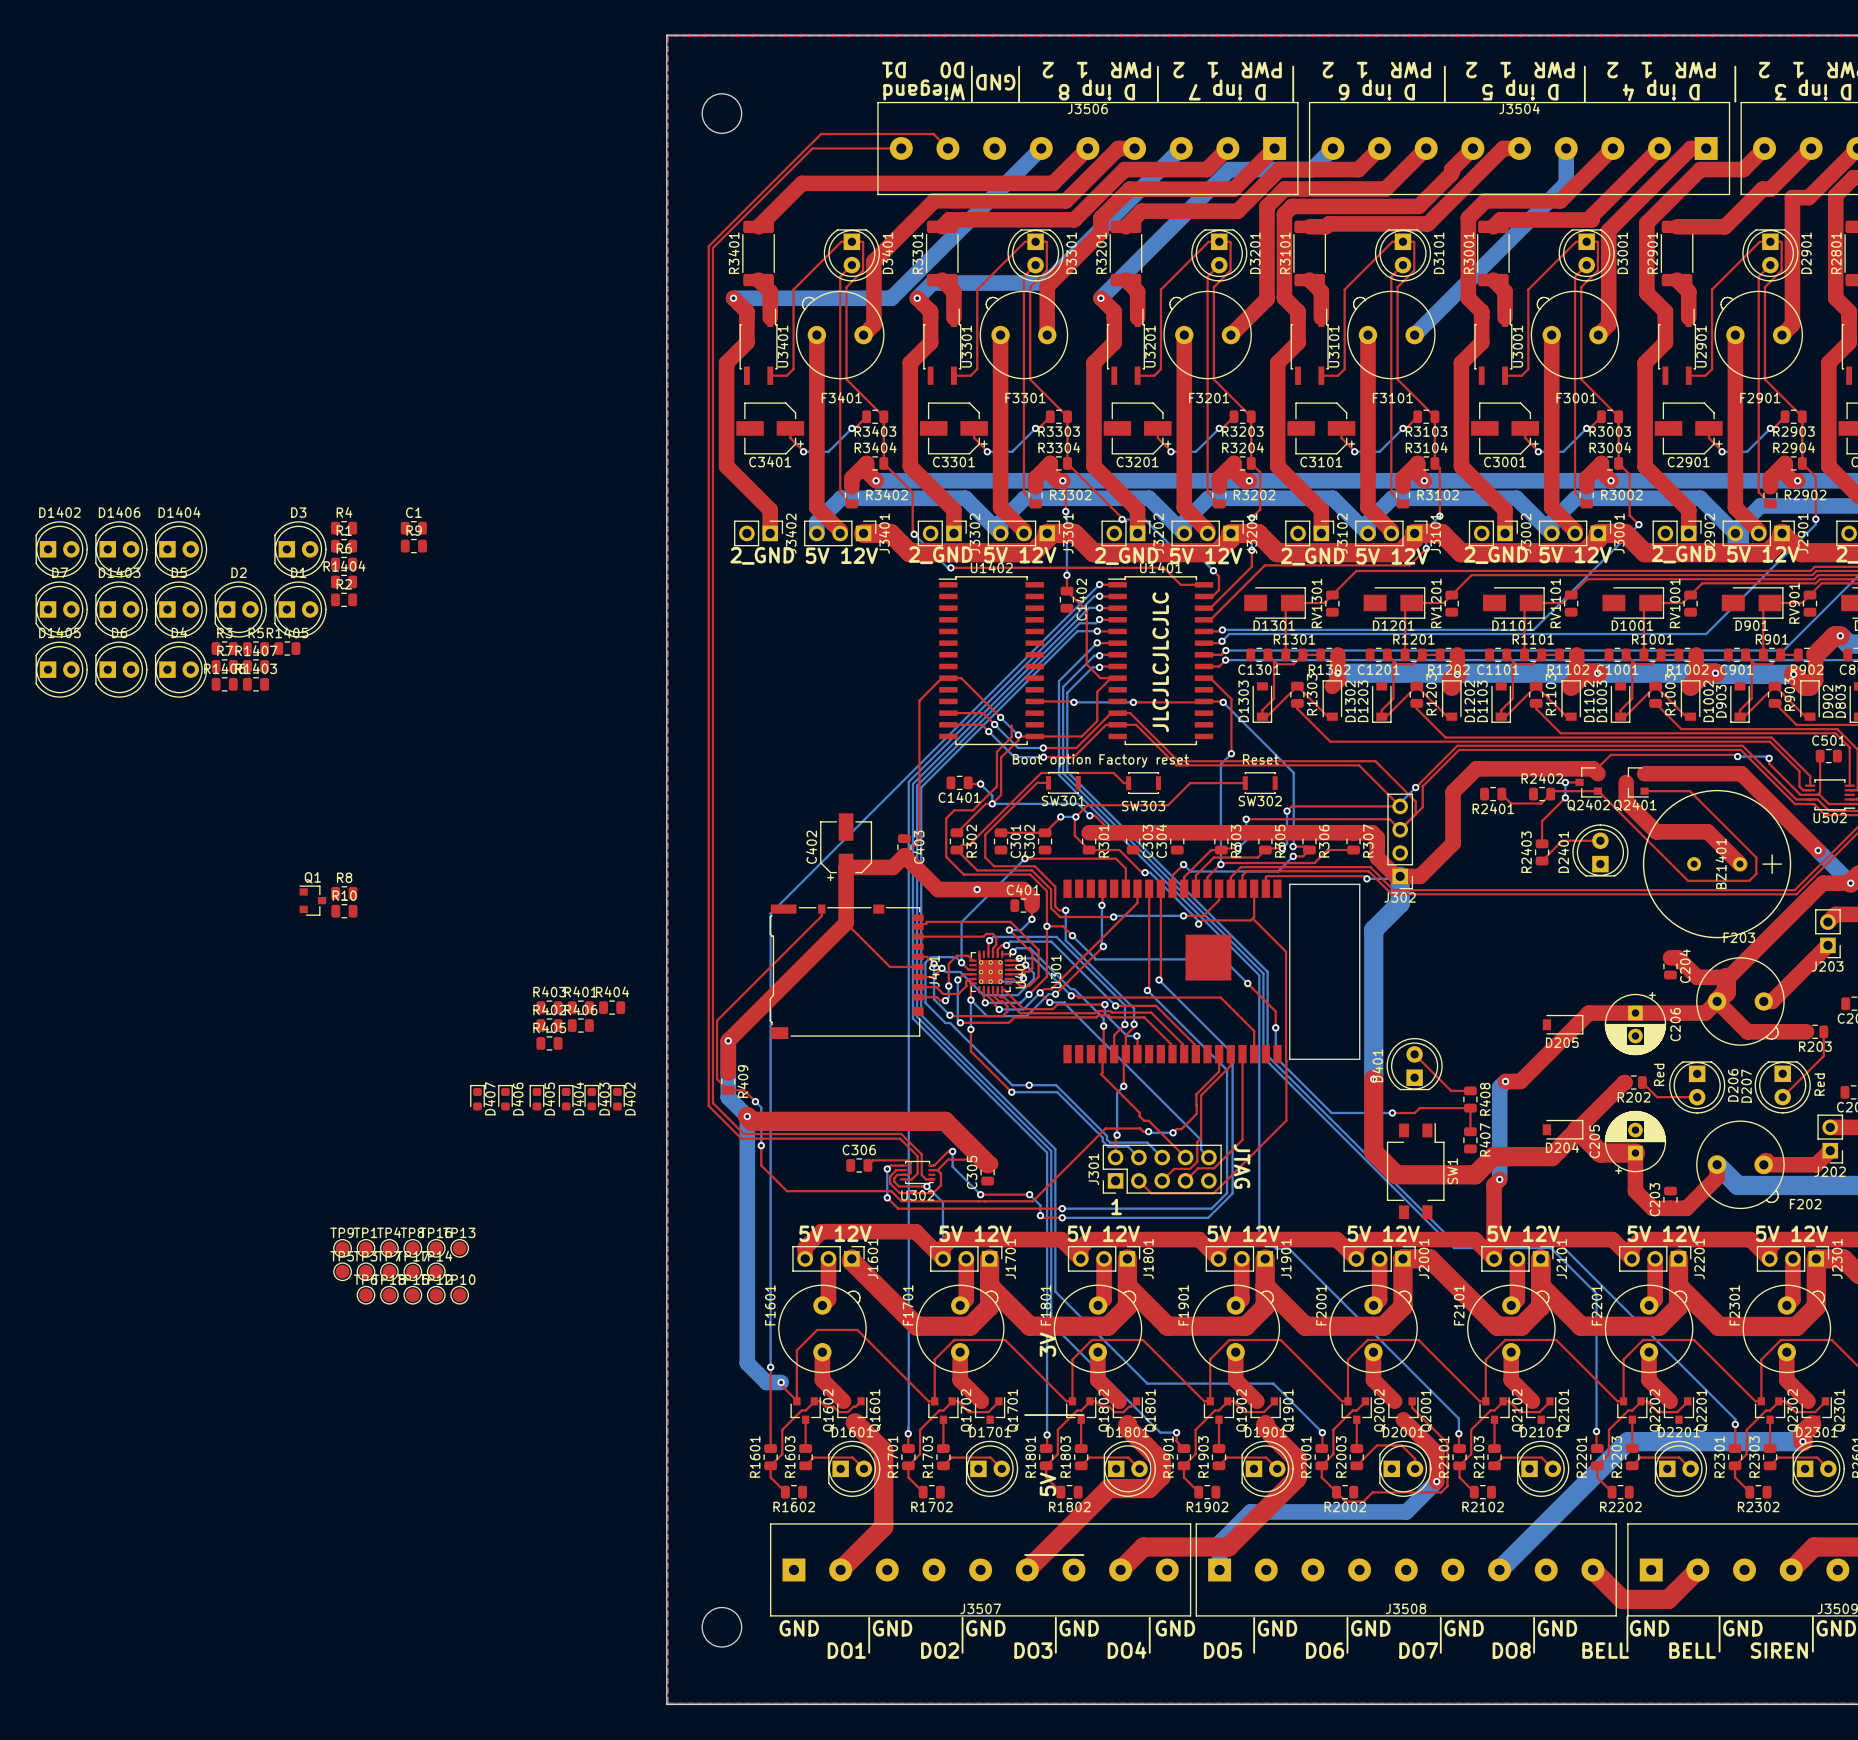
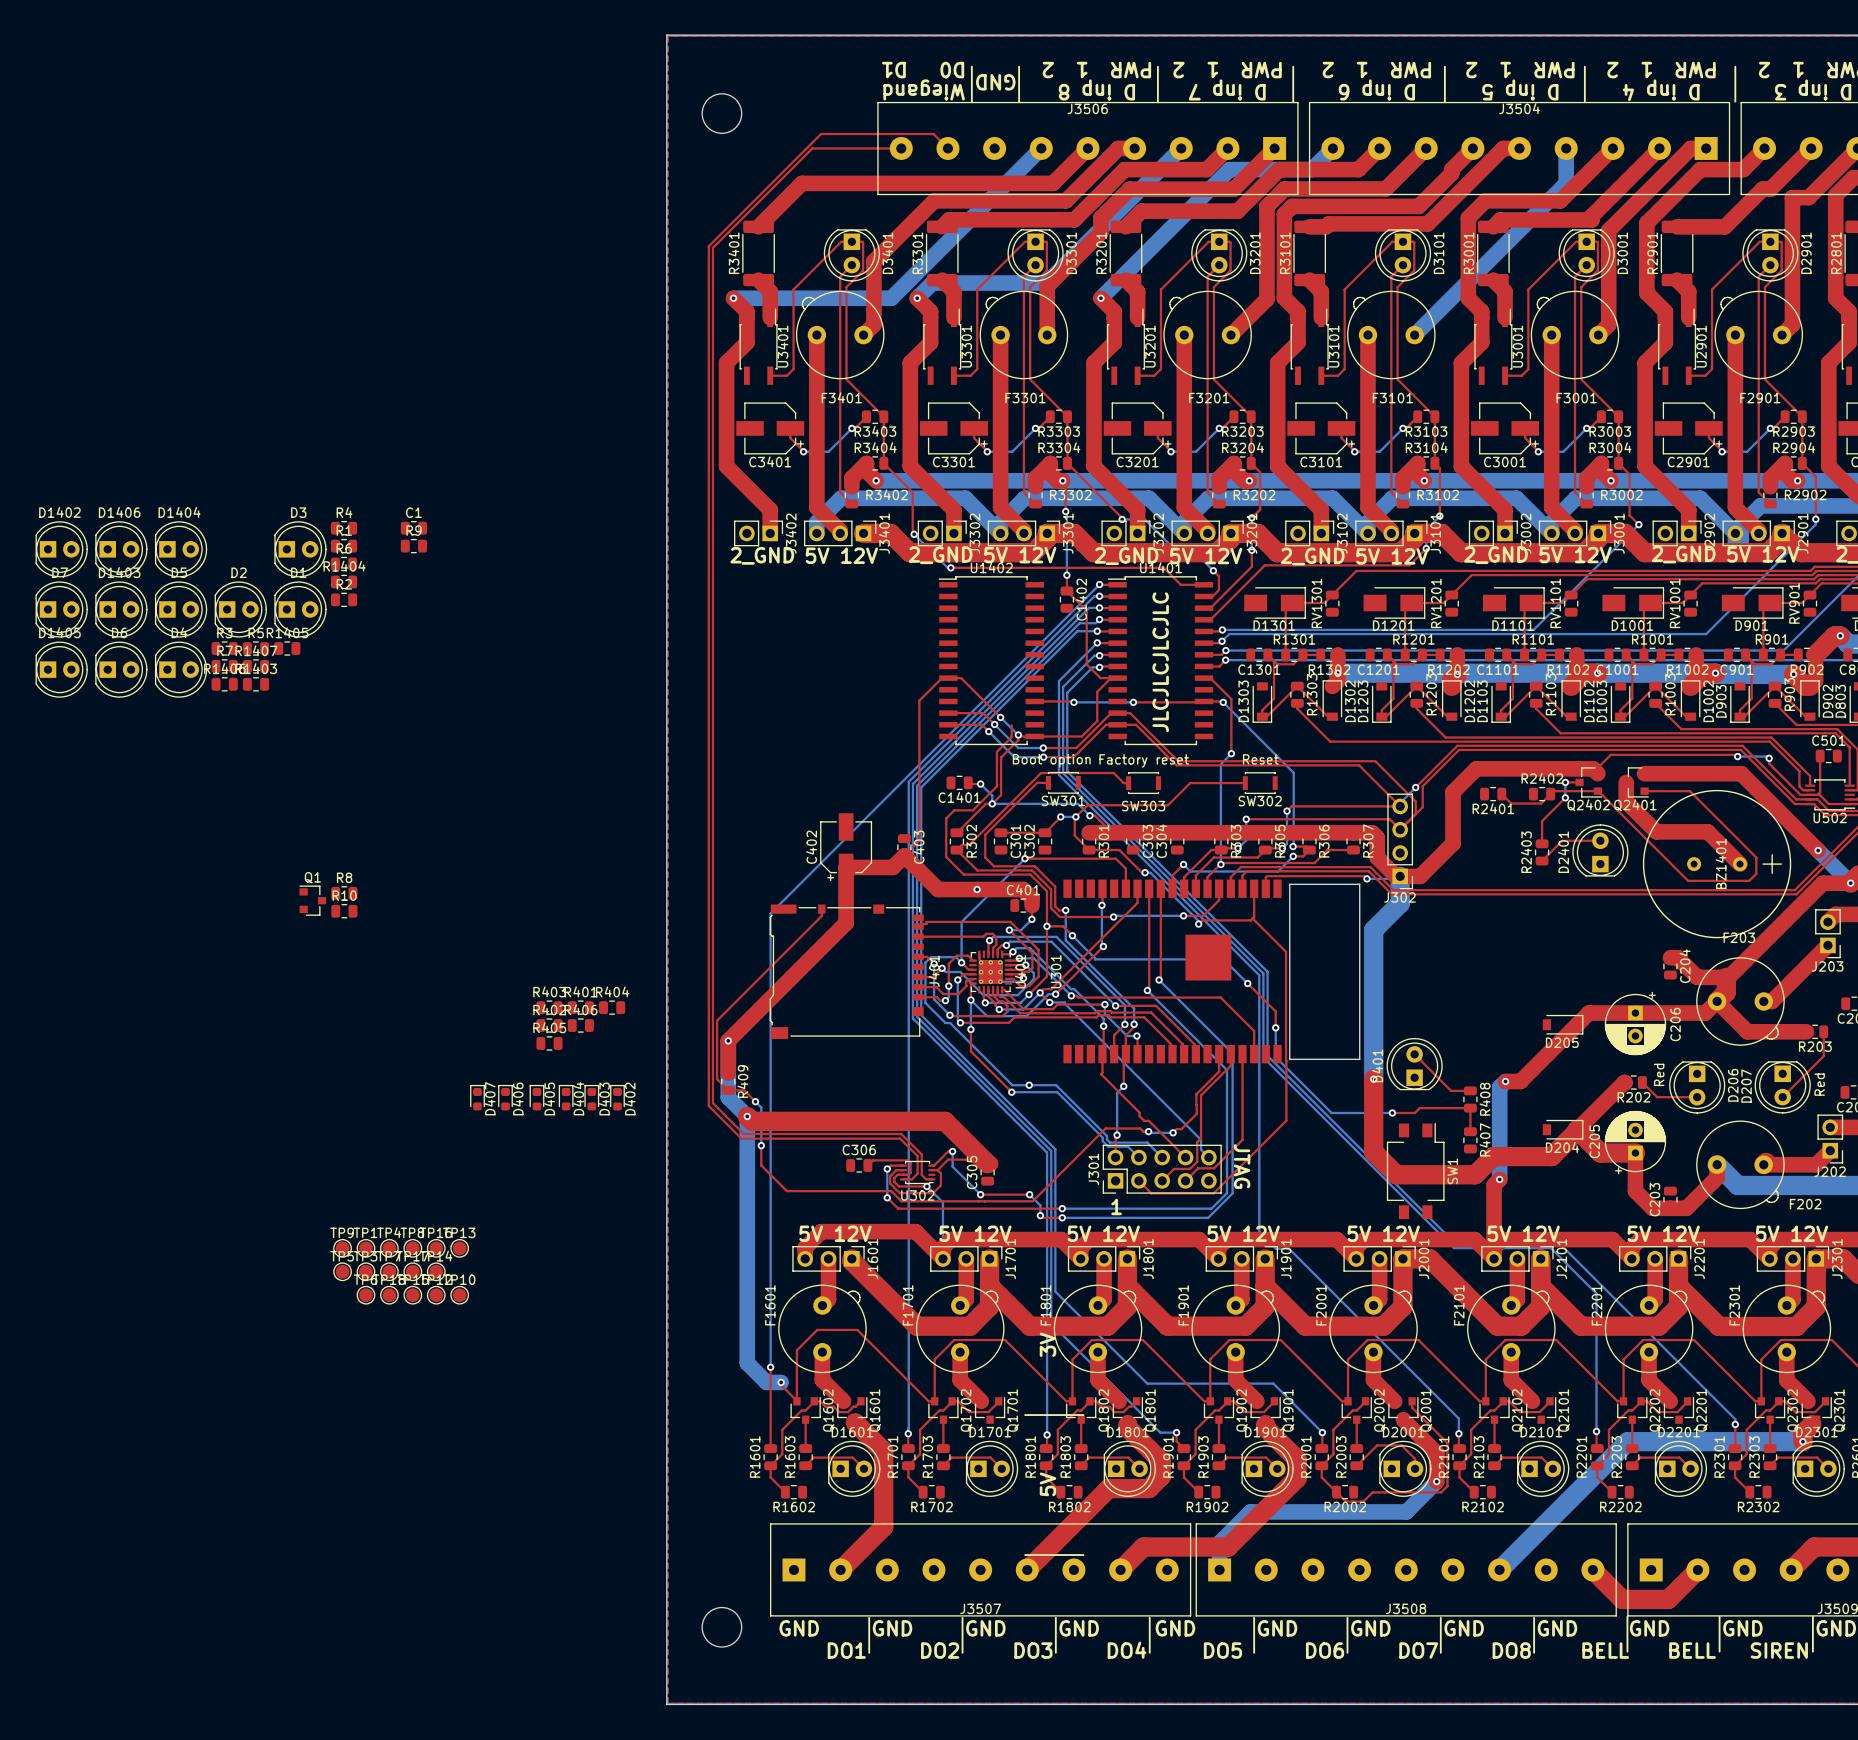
top track: (846, 923) (890, 966) (917, 967) -> none

